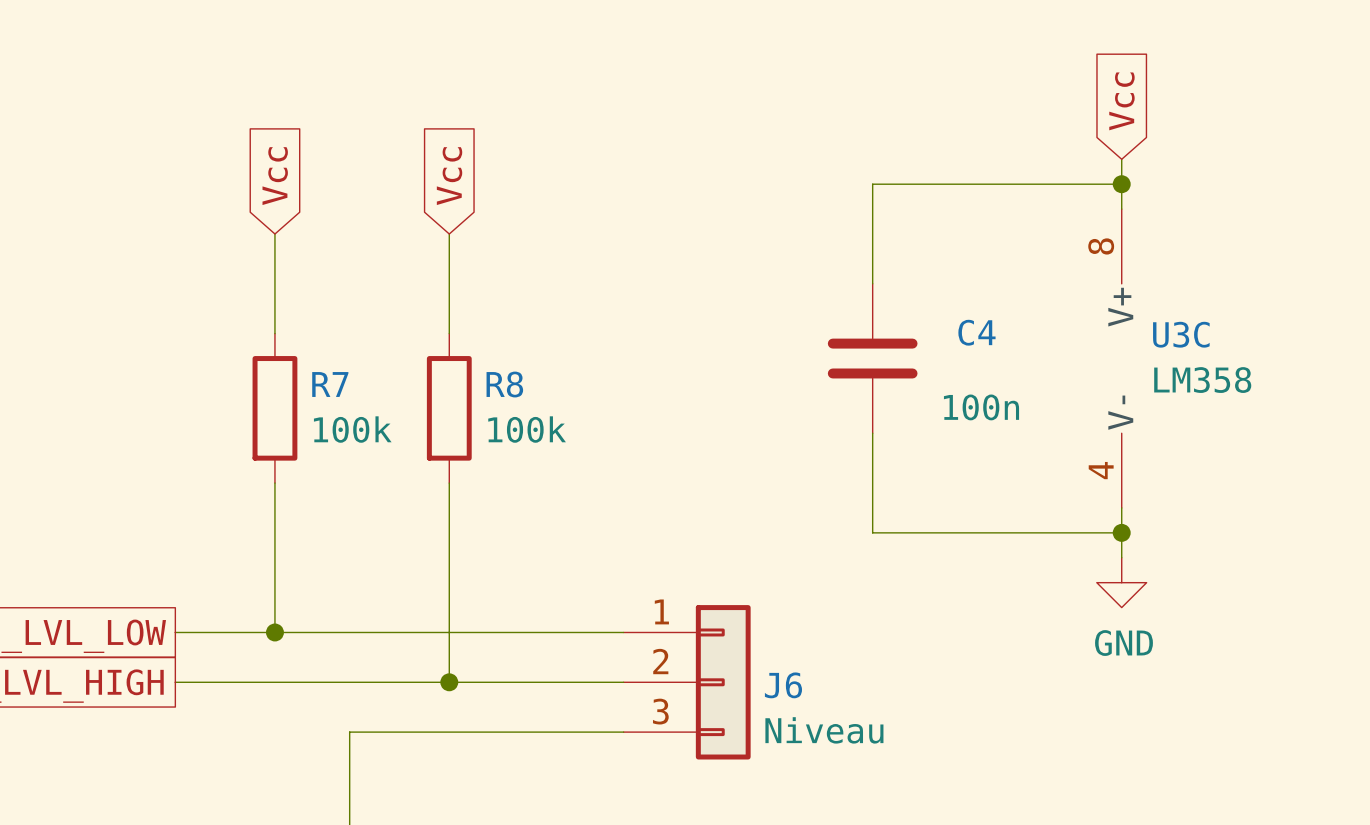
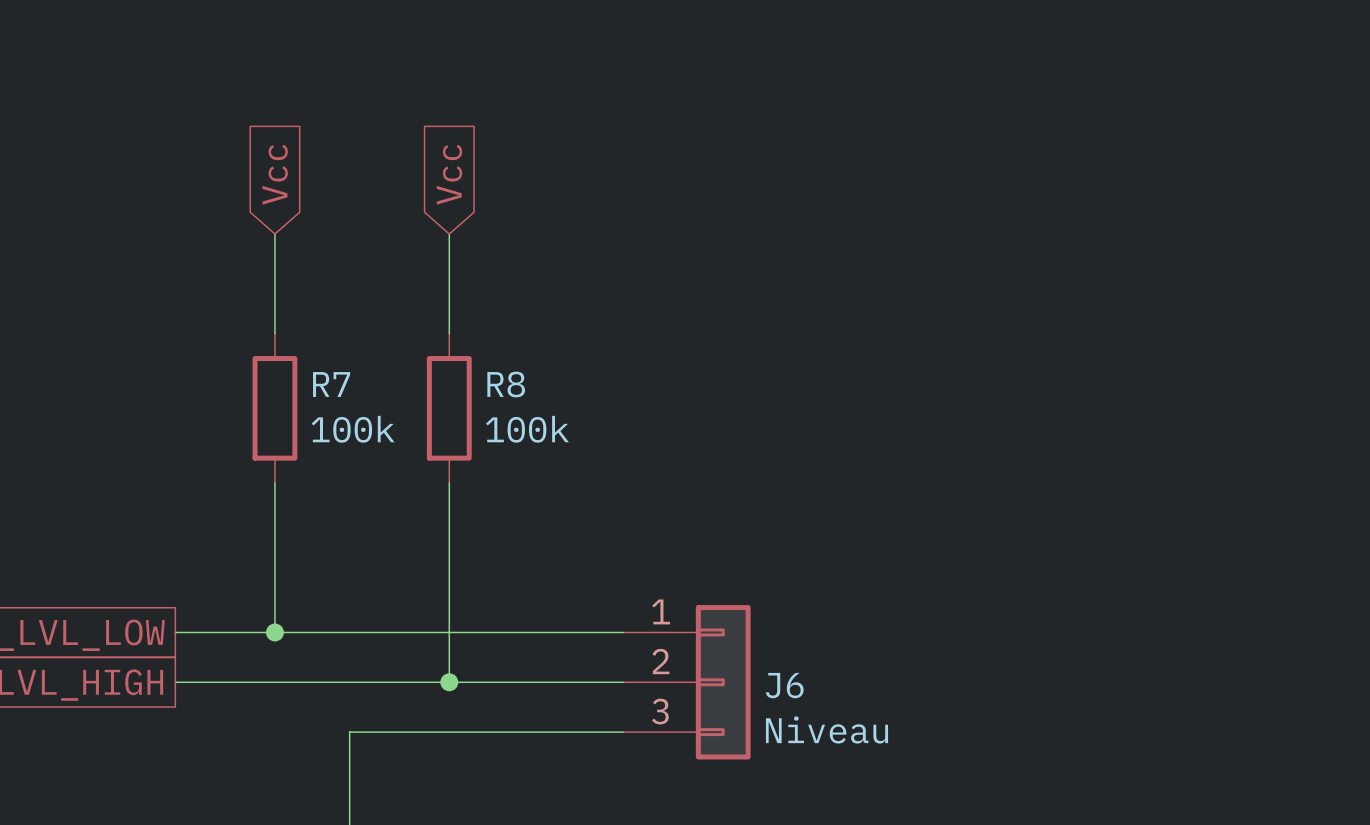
global label: Vcc (1121, 101) -> none
wire: (1121, 159) (1121, 209) -> none
wire: (1121, 184) (872, 184) (872, 283) -> none
junction: (1121, 184) -> none
C4: 100n (872, 358) -> none
U3C: LM358 (1121, 358) -> none
wire: (872, 433) (872, 532) (1121, 532) -> none
wire: (1121, 507) (1121, 557) -> none
junction: (1121, 532) -> none
power symbol: GND (1121, 582) -> none

